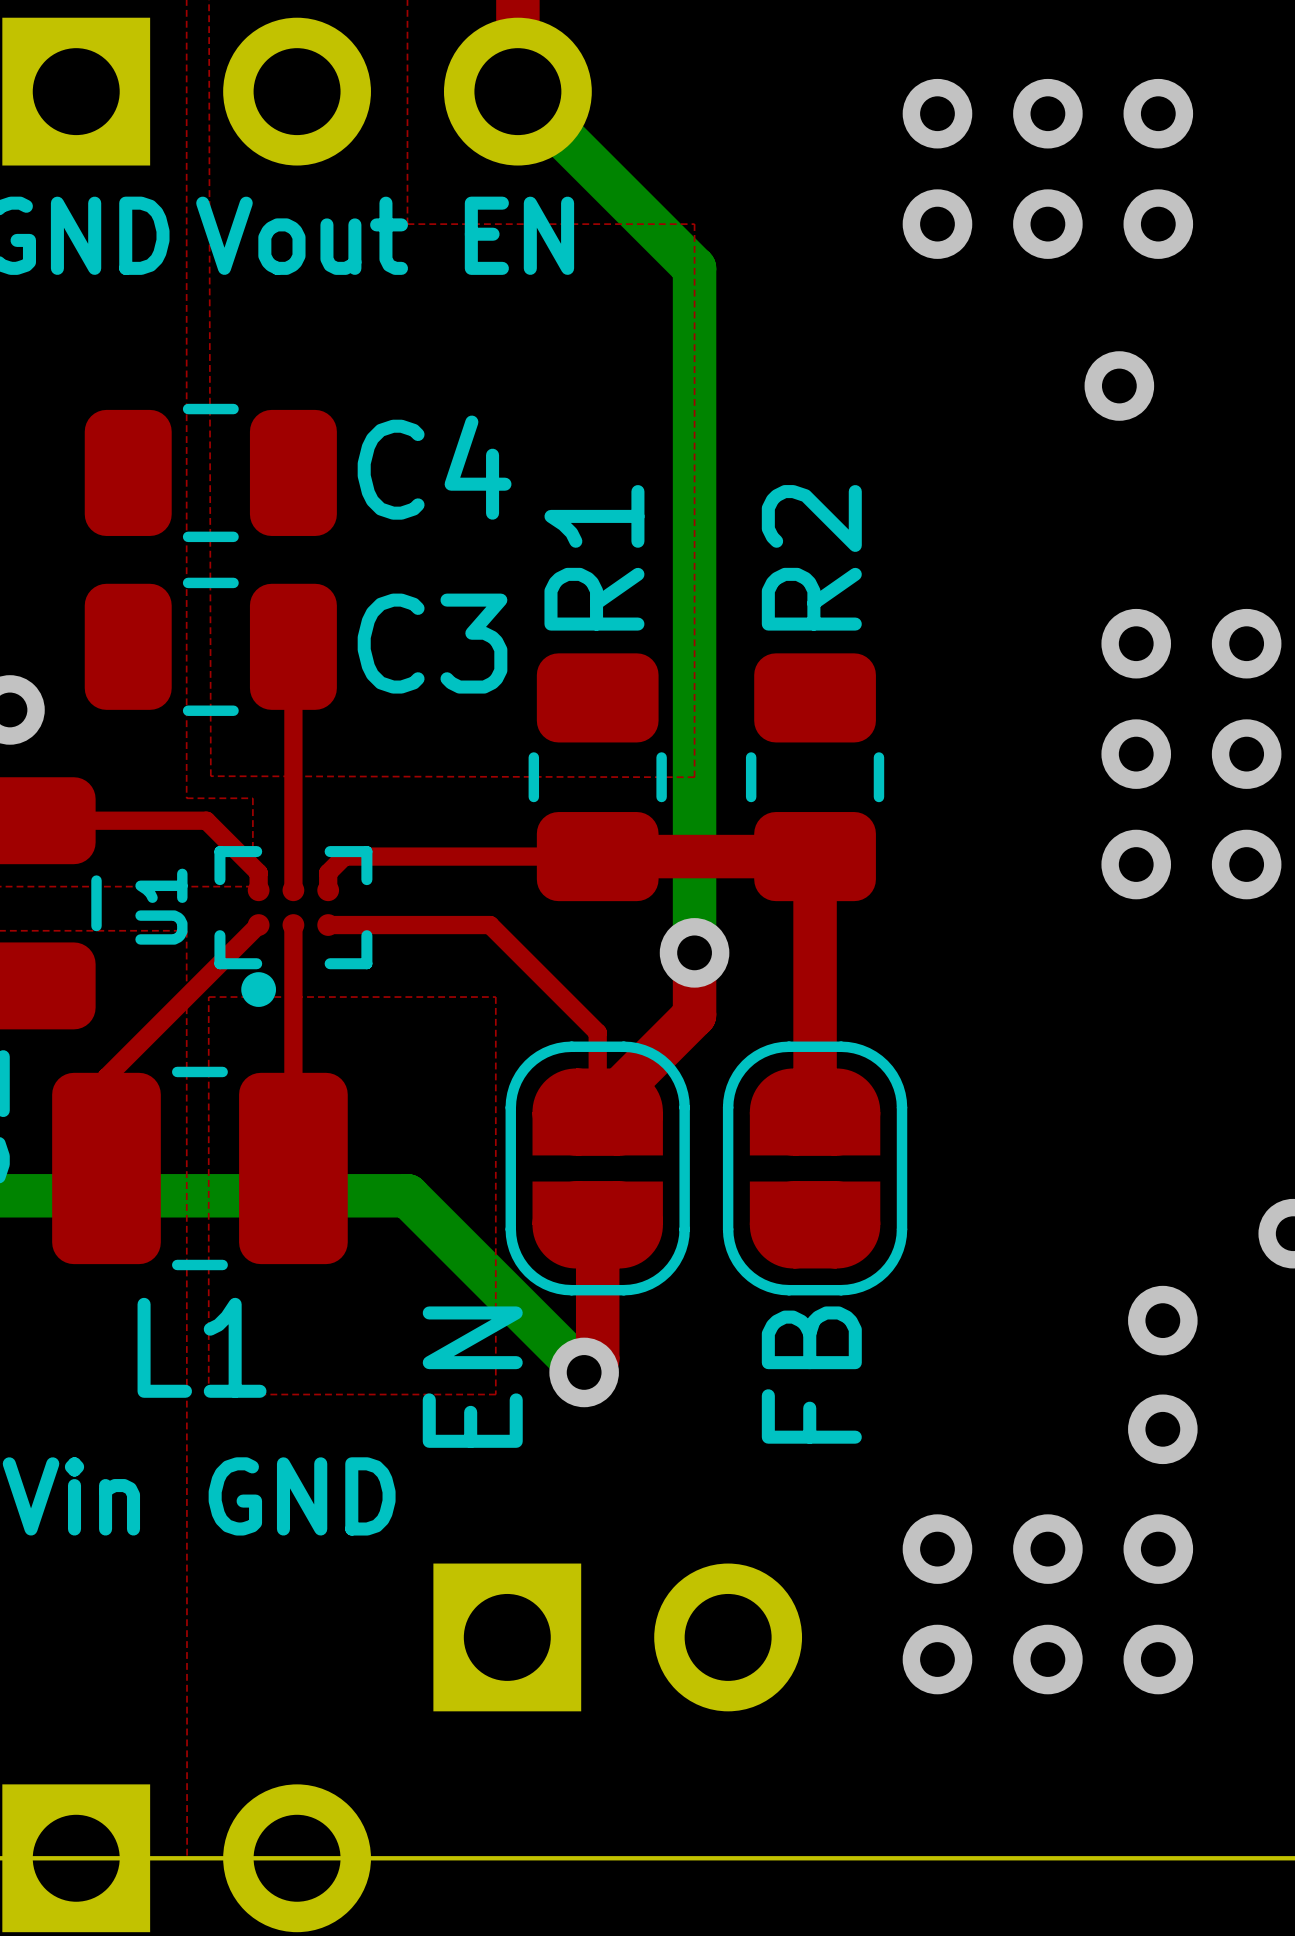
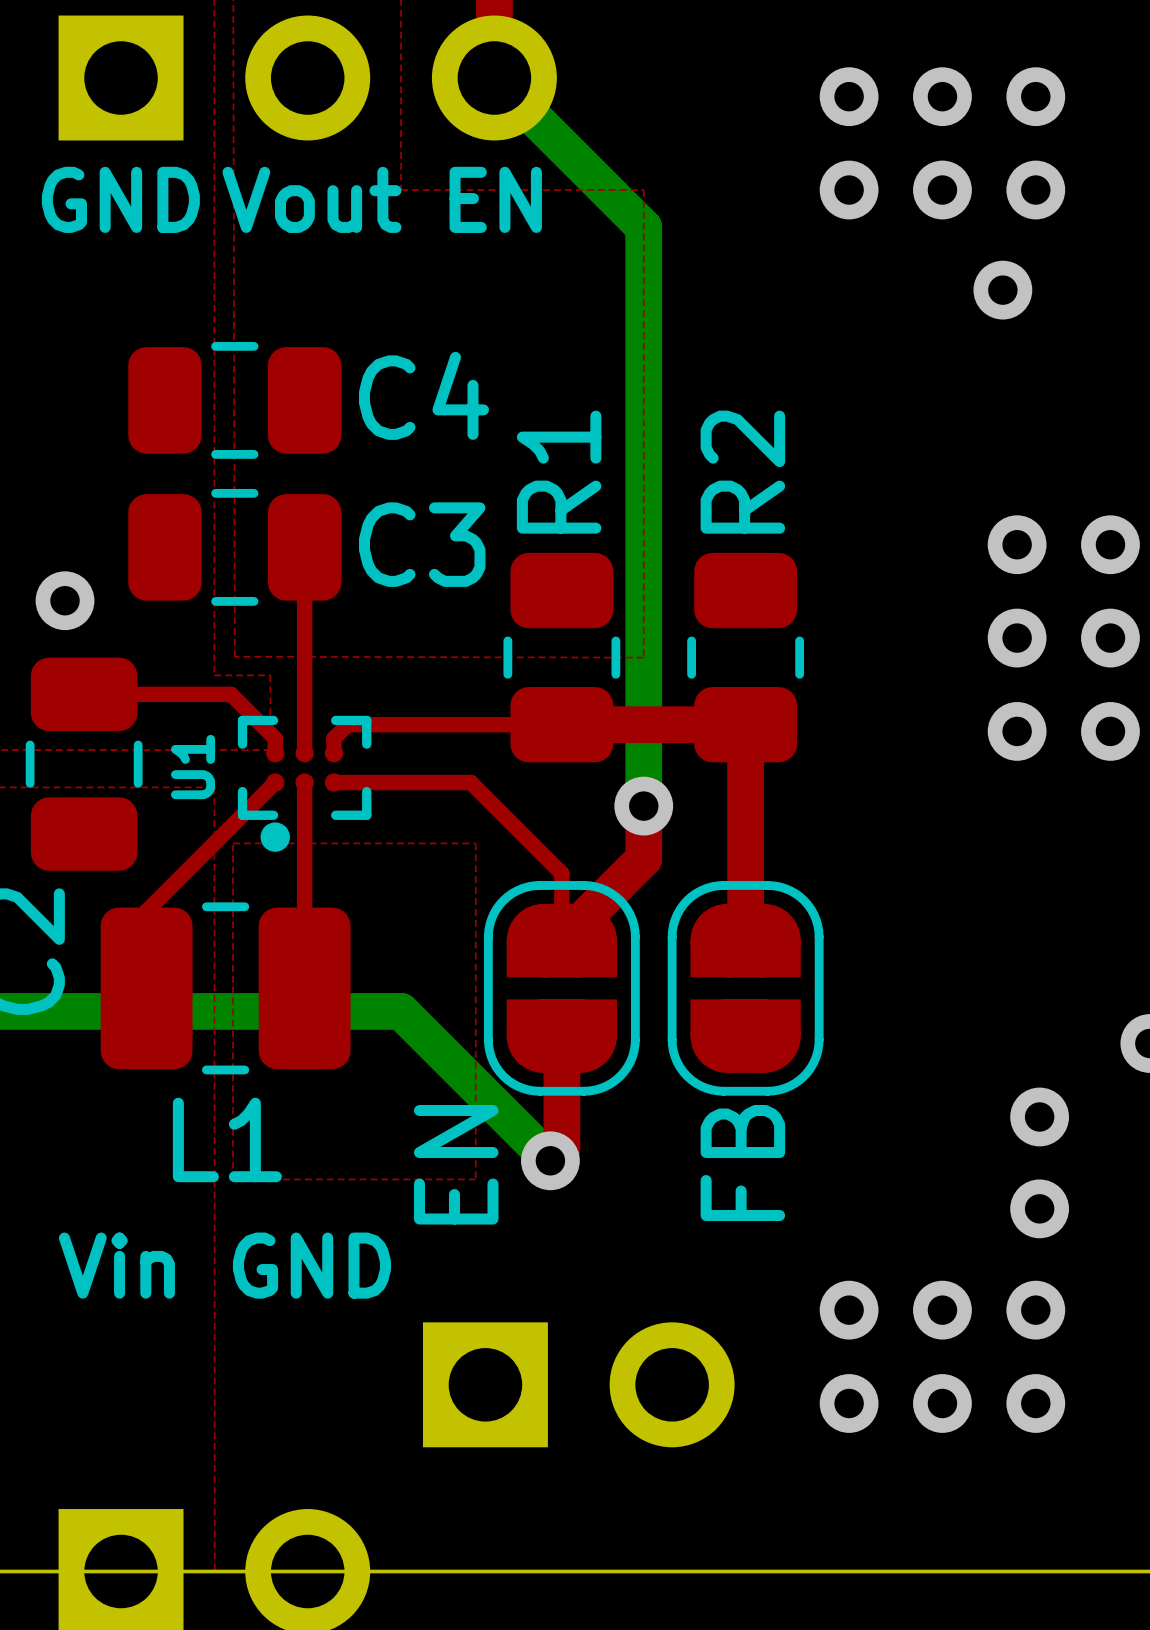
via position: (1119, 386) -> (1002, 290)

